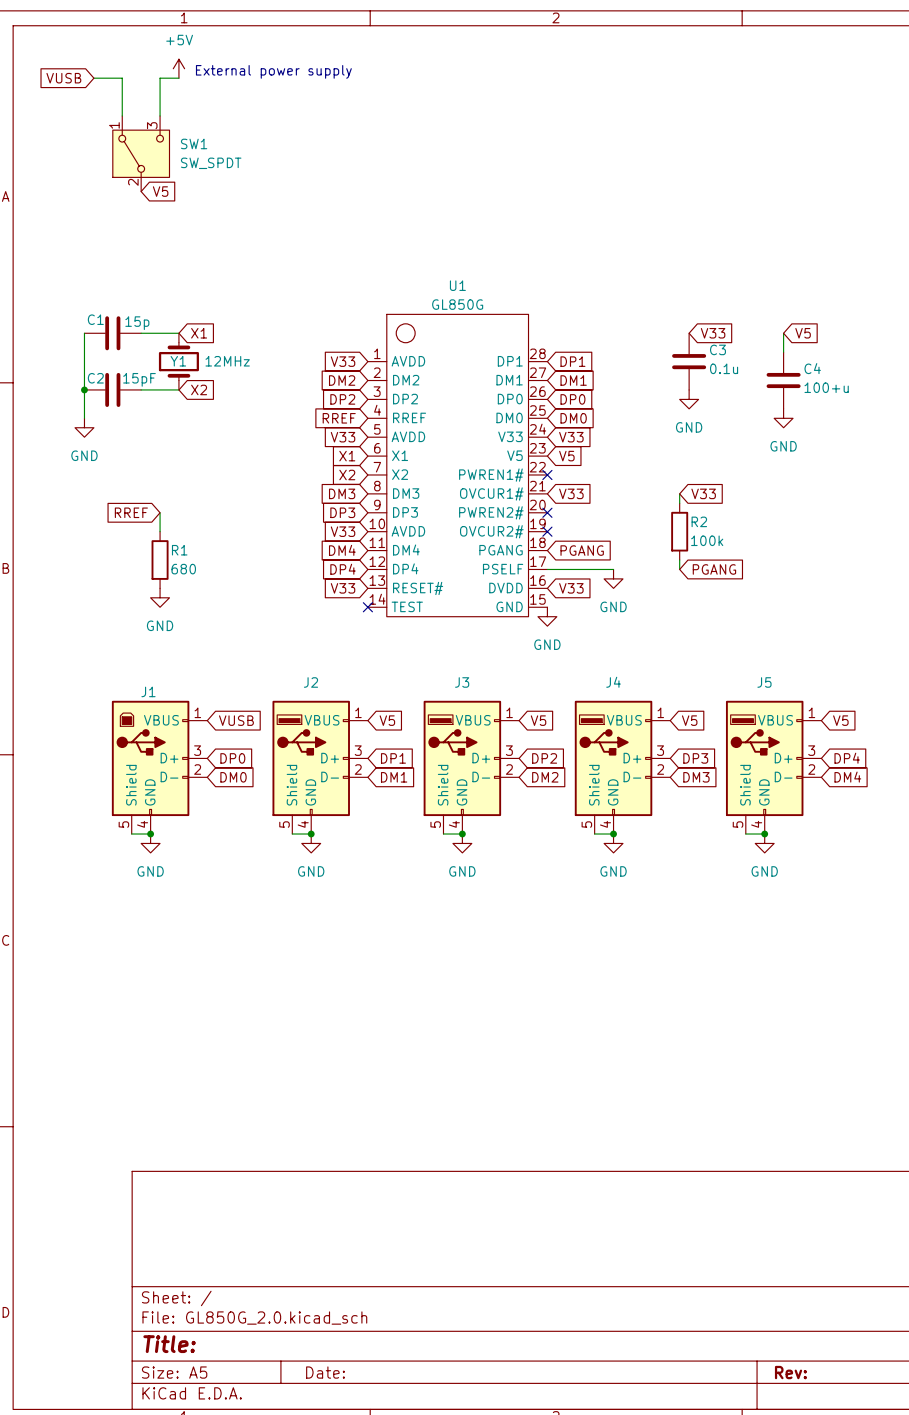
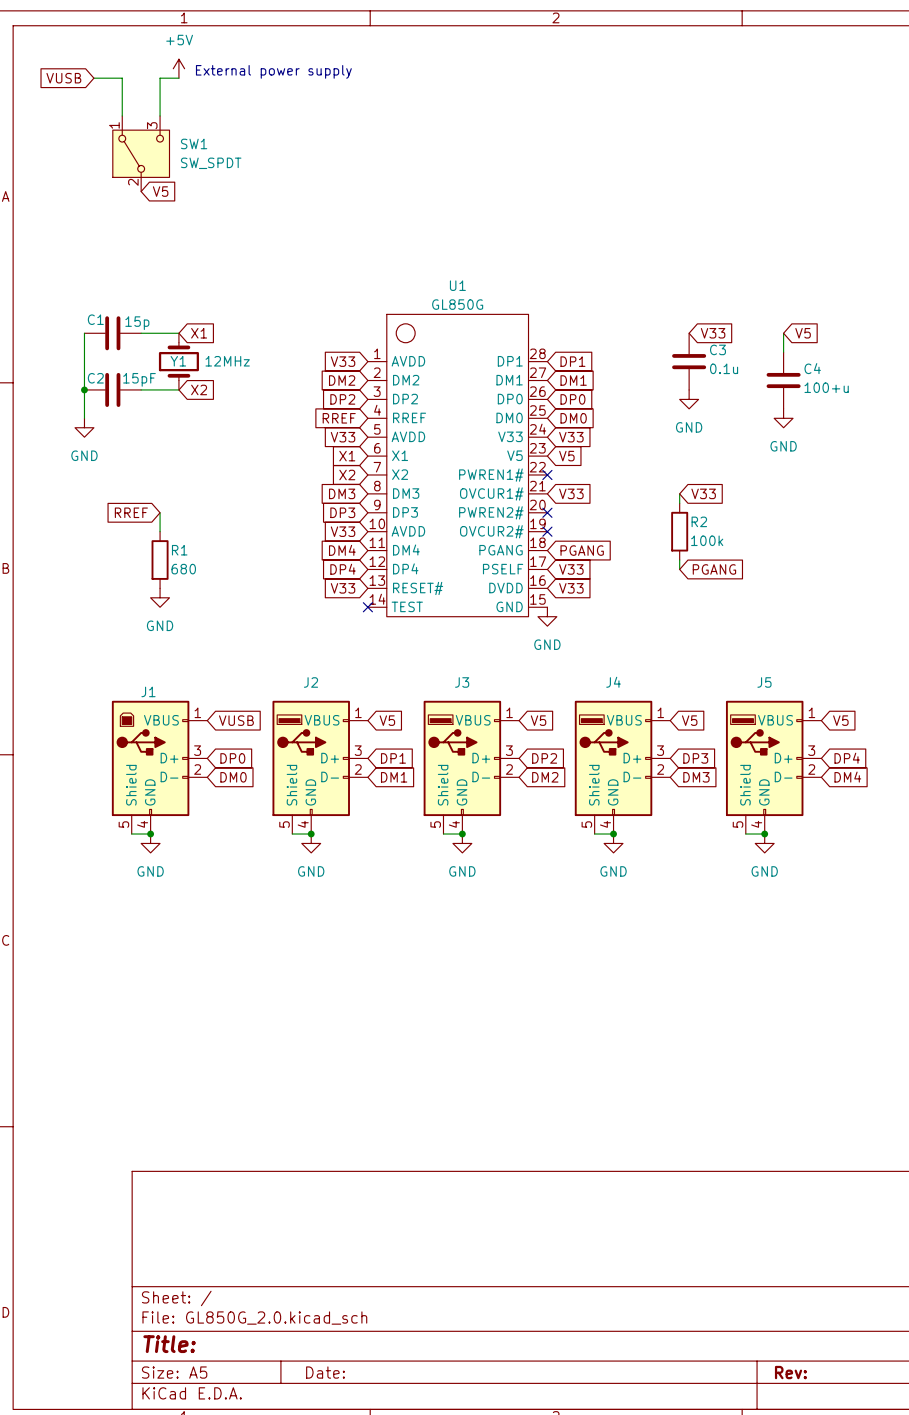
wire: (547, 569) (613, 569) -> none
global label: none -> V33 (571, 569)
power symbol: GND (613, 578) -> none

